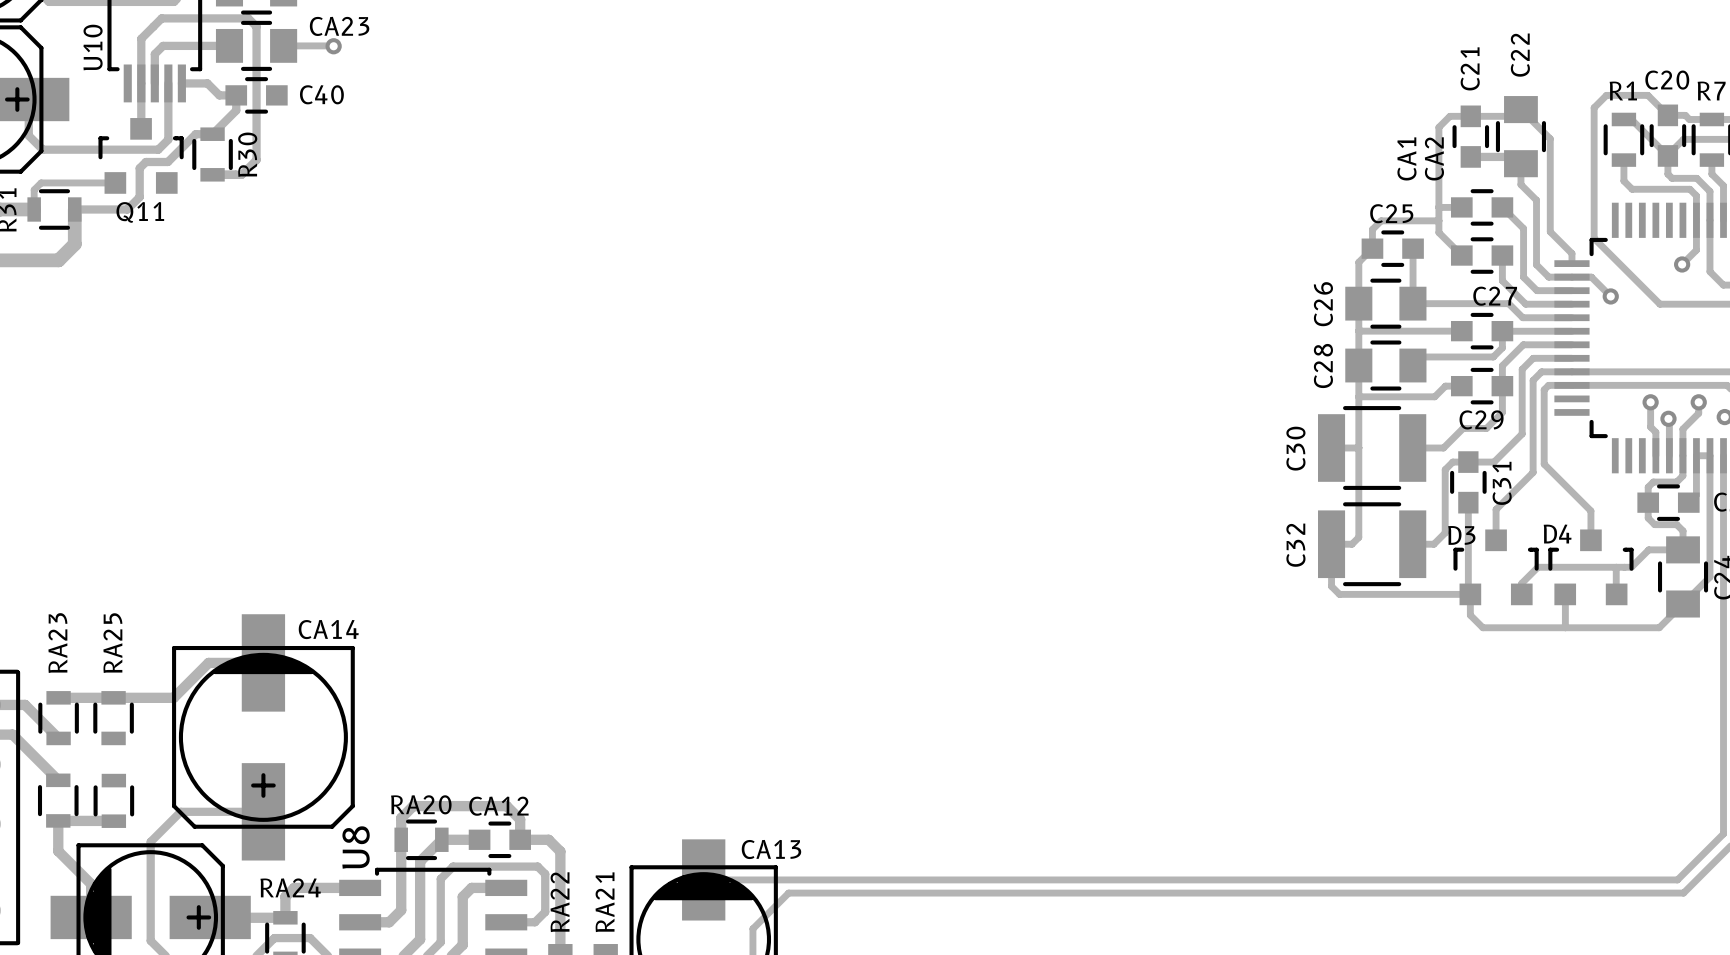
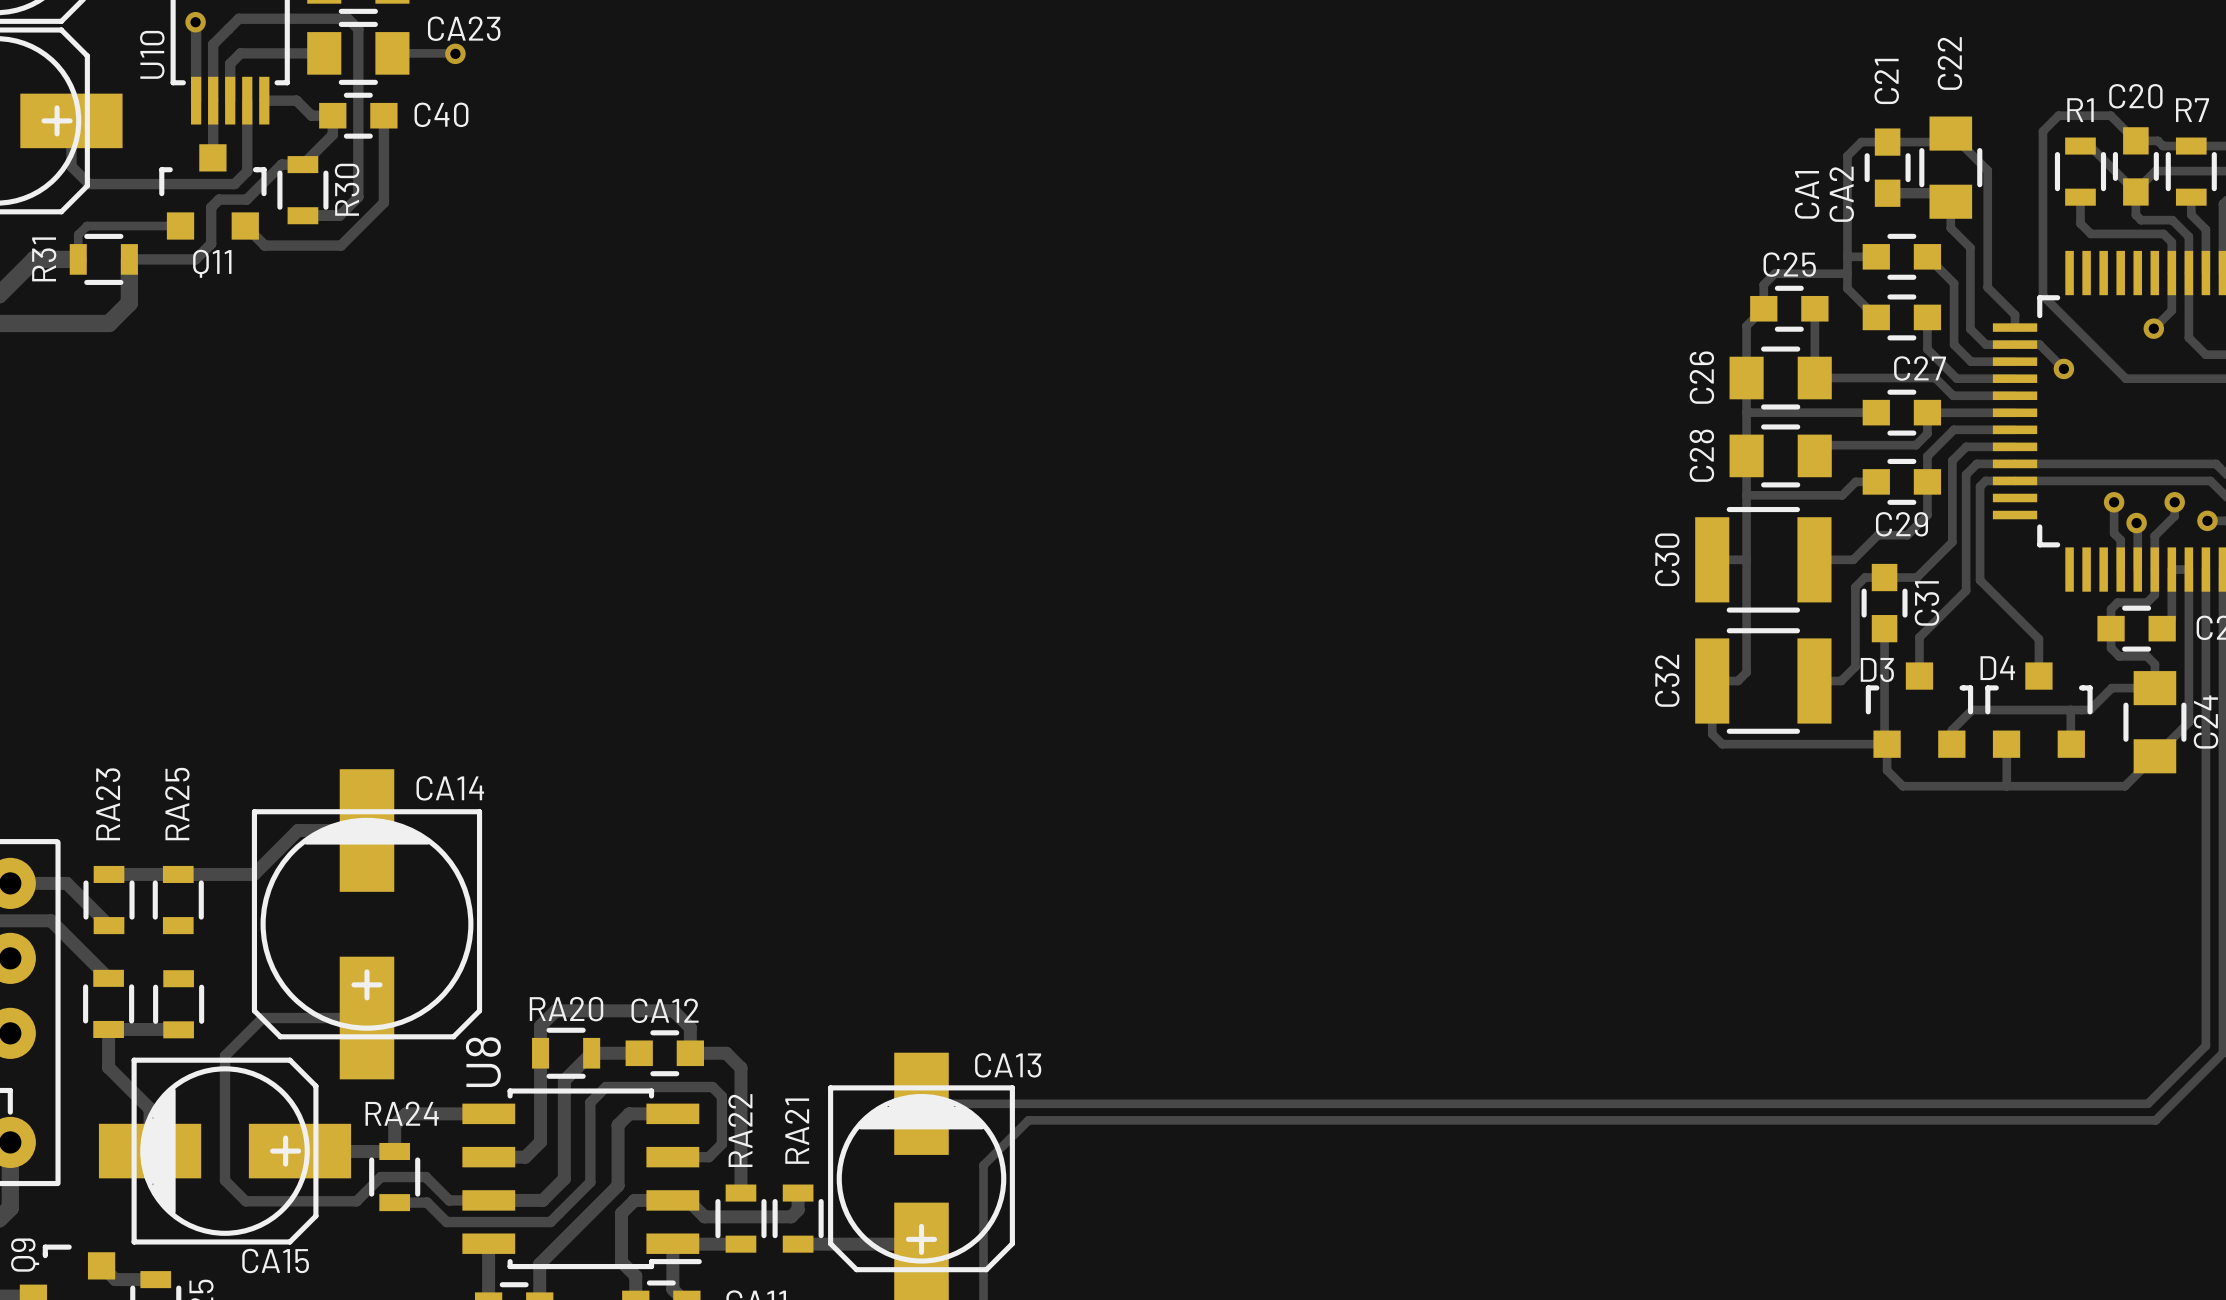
track: none -> (195, 22) (196, 100)
via: none -> (195, 22)
track: none -> (383, 115) (383, 202) (341, 245) (264, 245) (245, 226)

